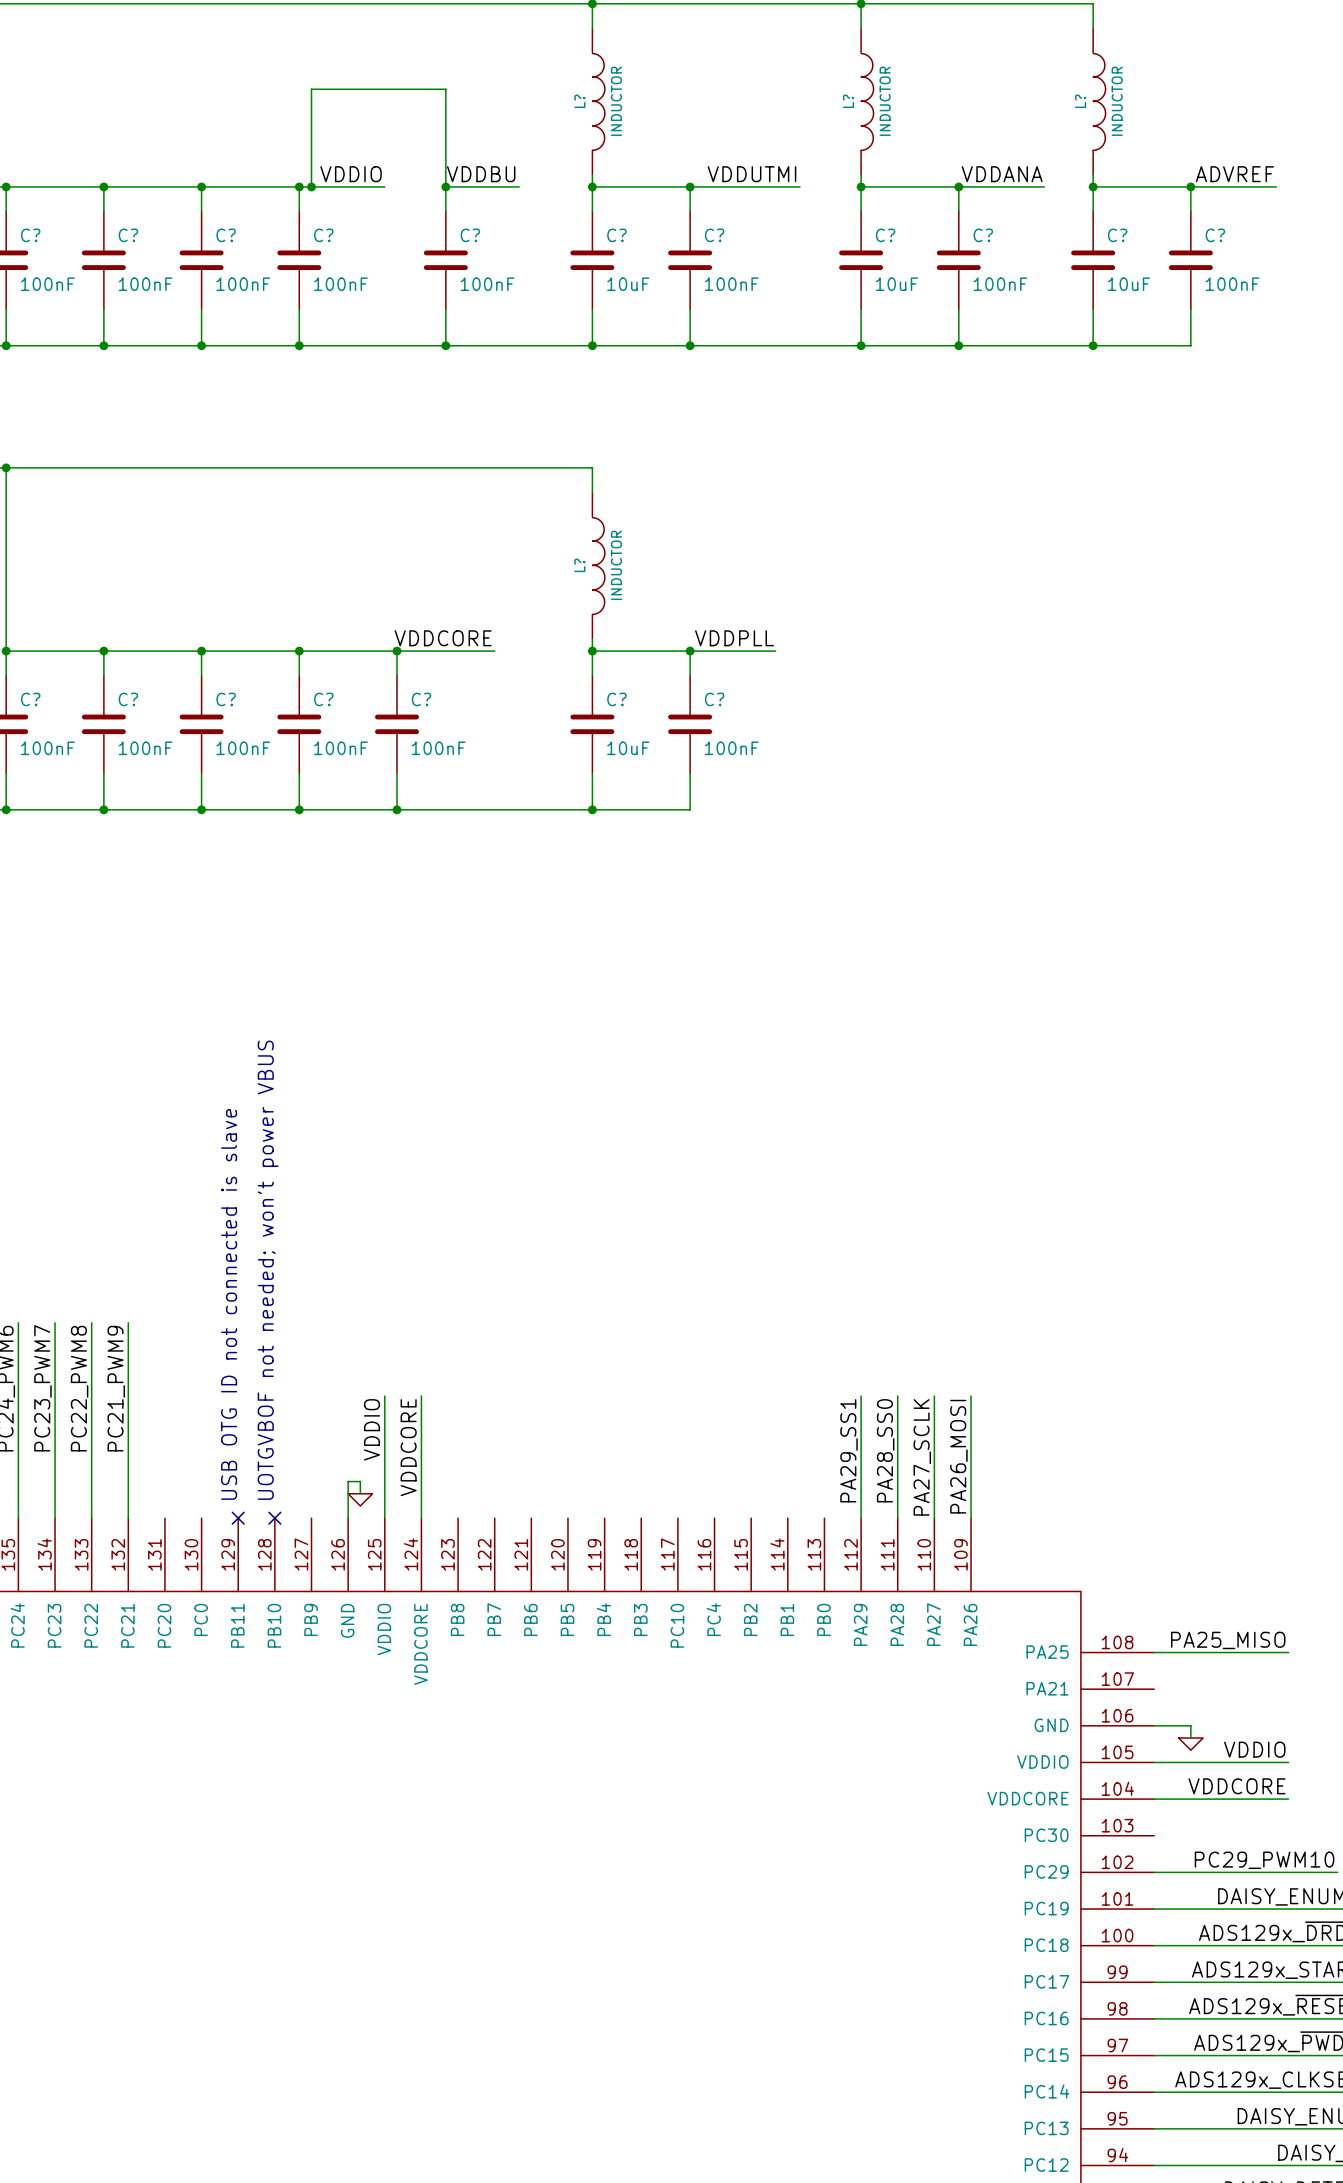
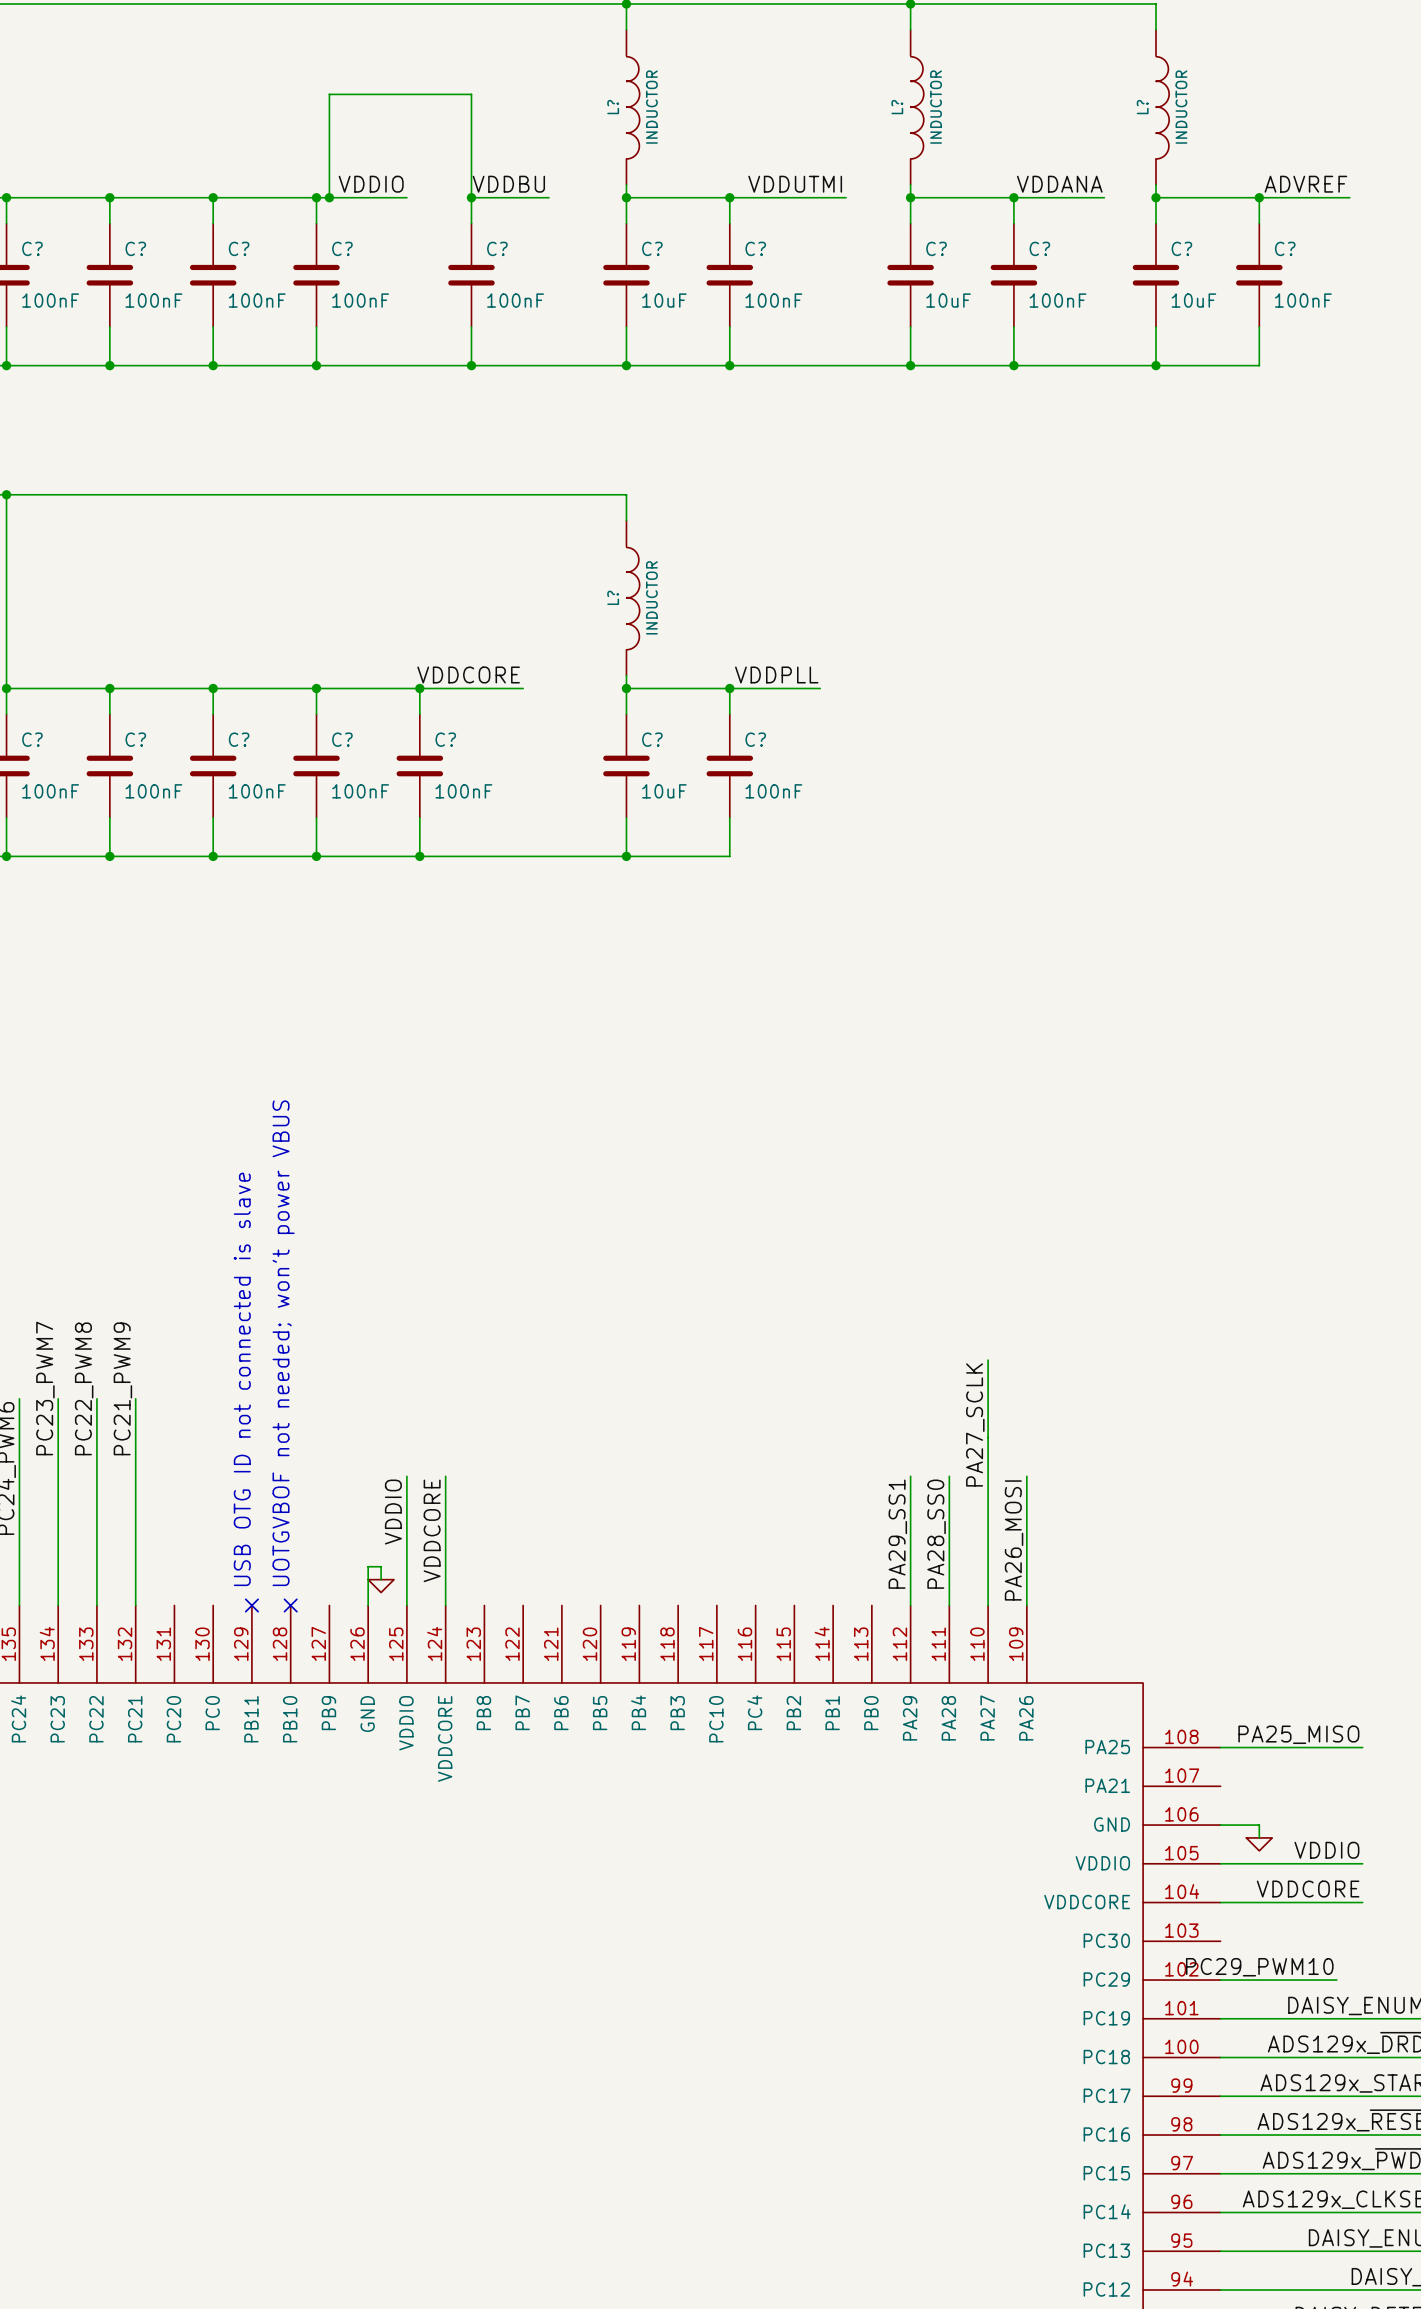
wire: none -> (988, 1360) (988, 1476)
label position: PC23_PWM7 (42, 1388) -> PC23_PWM7 (45, 1388)
label position: PC22_PWM8 (79, 1388) -> PC22_PWM8 (84, 1388)
label position: PC21_PWM9 (116, 1388) -> PC21_PWM9 (122, 1388)
label position: PA27_SCLK (922, 1457) -> PA27_SCLK (975, 1424)
label position: PC29_PWM10 (1264, 1860) -> PC29_PWM10 (1259, 1967)
wire: (1264, 1872) (1337, 1872) -> none

